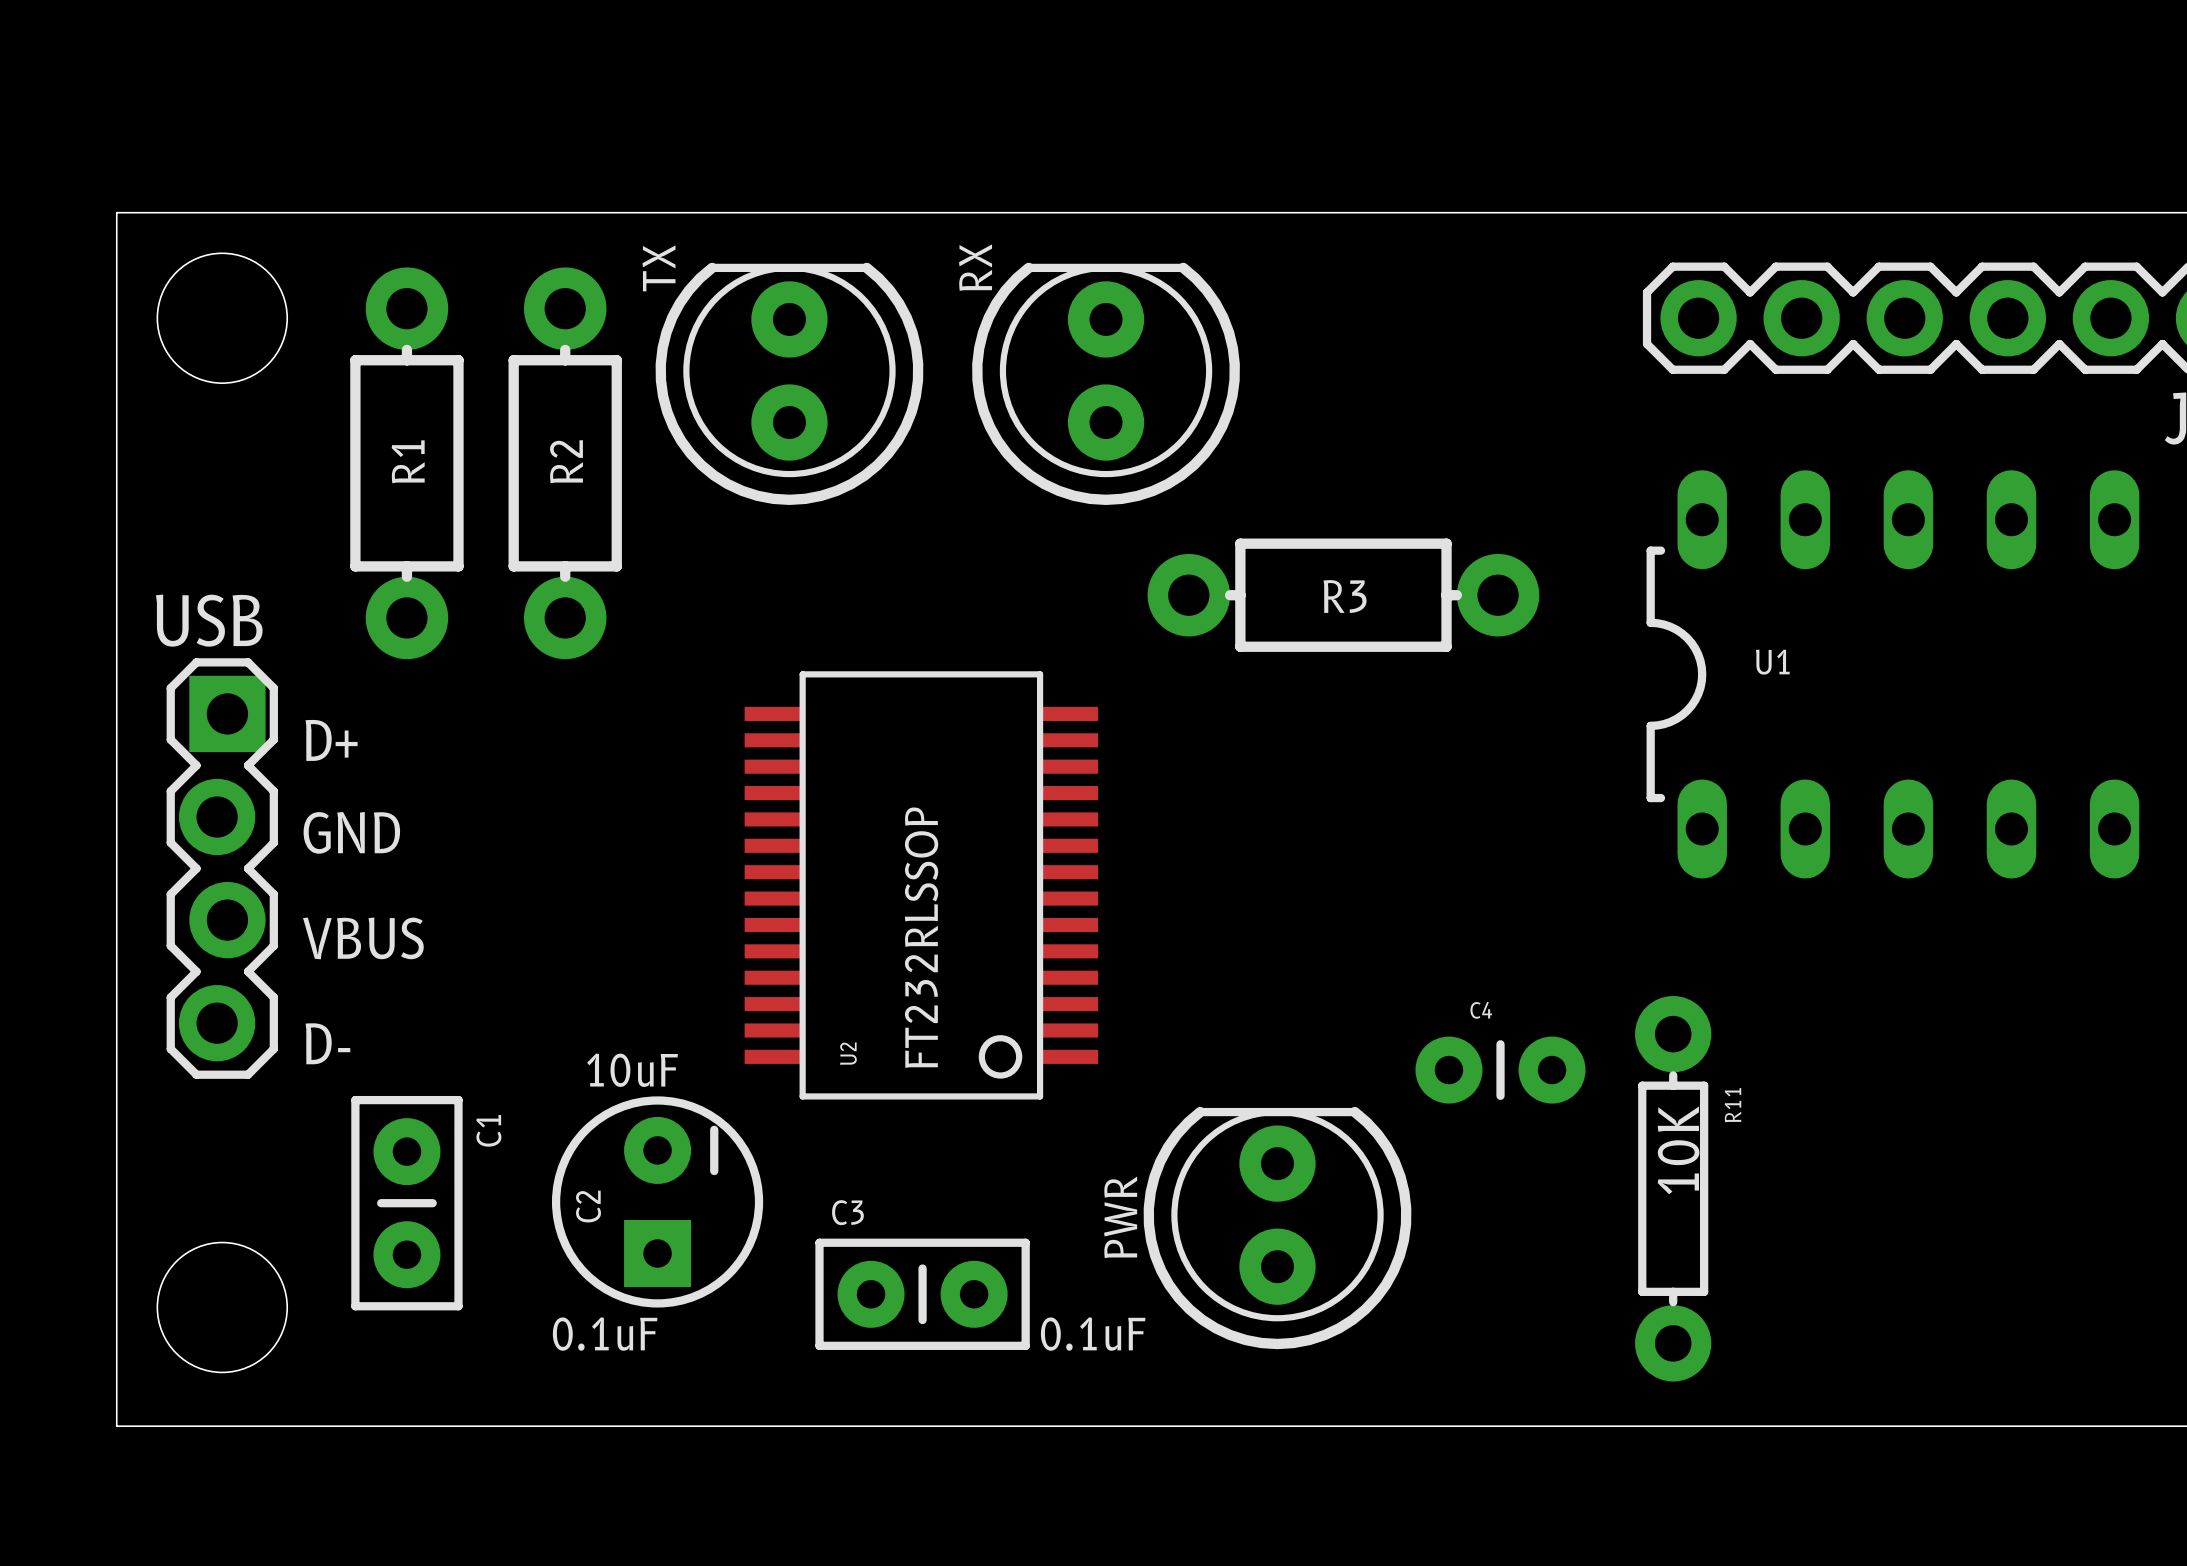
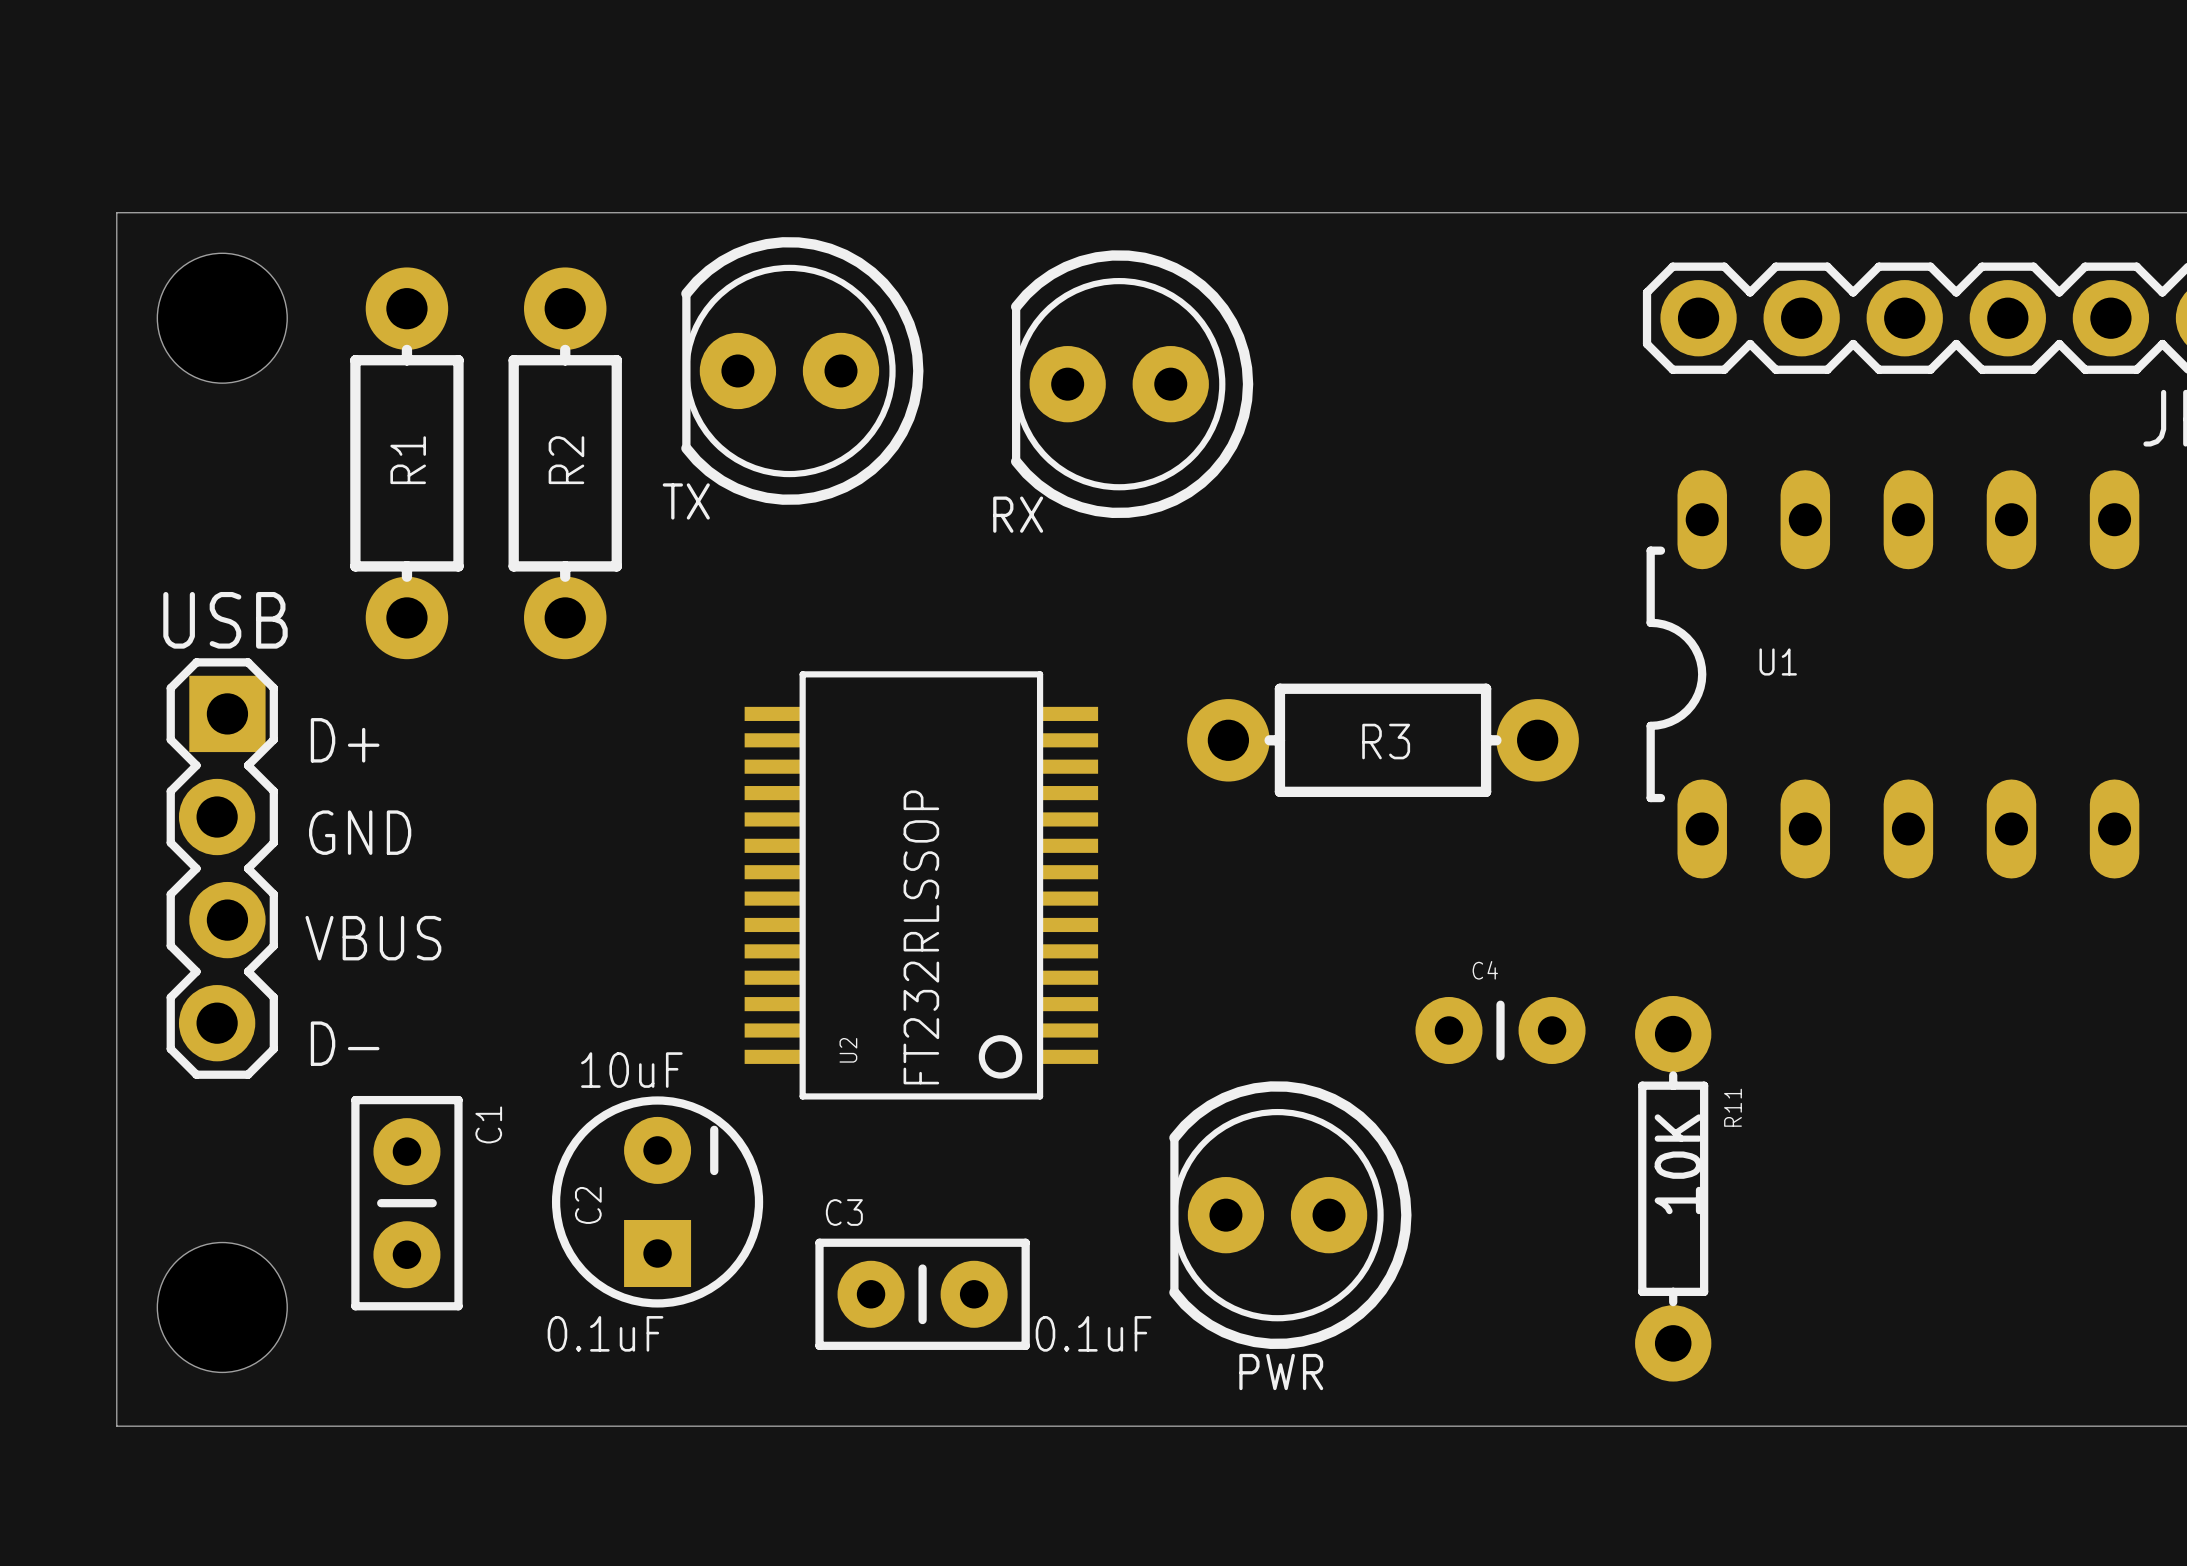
TX rotation: 0° (789, 383) -> 90° counterclockwise (802, 370)
RX rotation: 0° (1106, 383) -> 90° counterclockwise (1132, 384)
R3 position: (1343, 595) -> (1383, 740)
C4 position: (1500, 1070) -> (1500, 1030)
PWR rotation: 0° (1277, 1228) -> 90° counterclockwise (1290, 1215)

